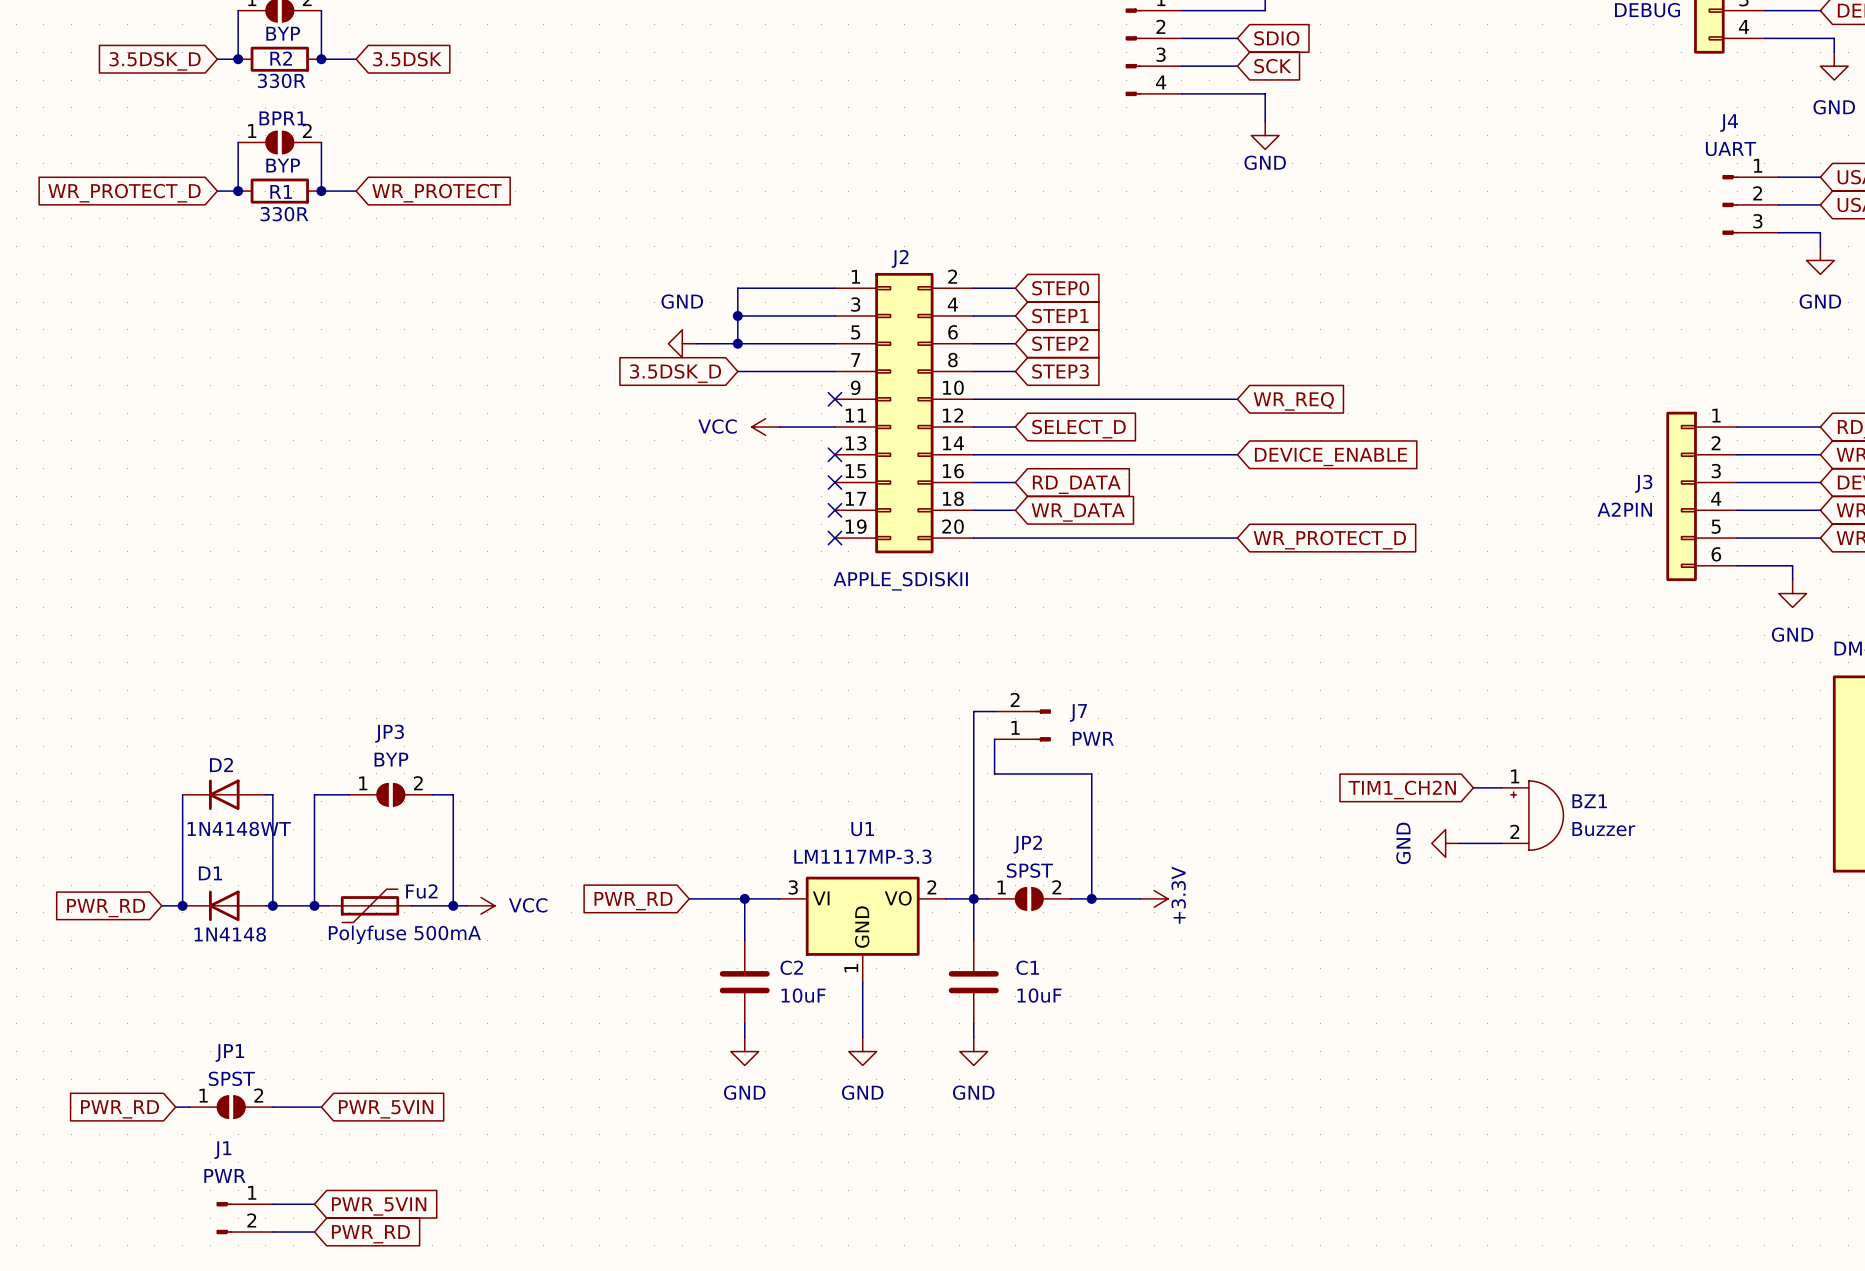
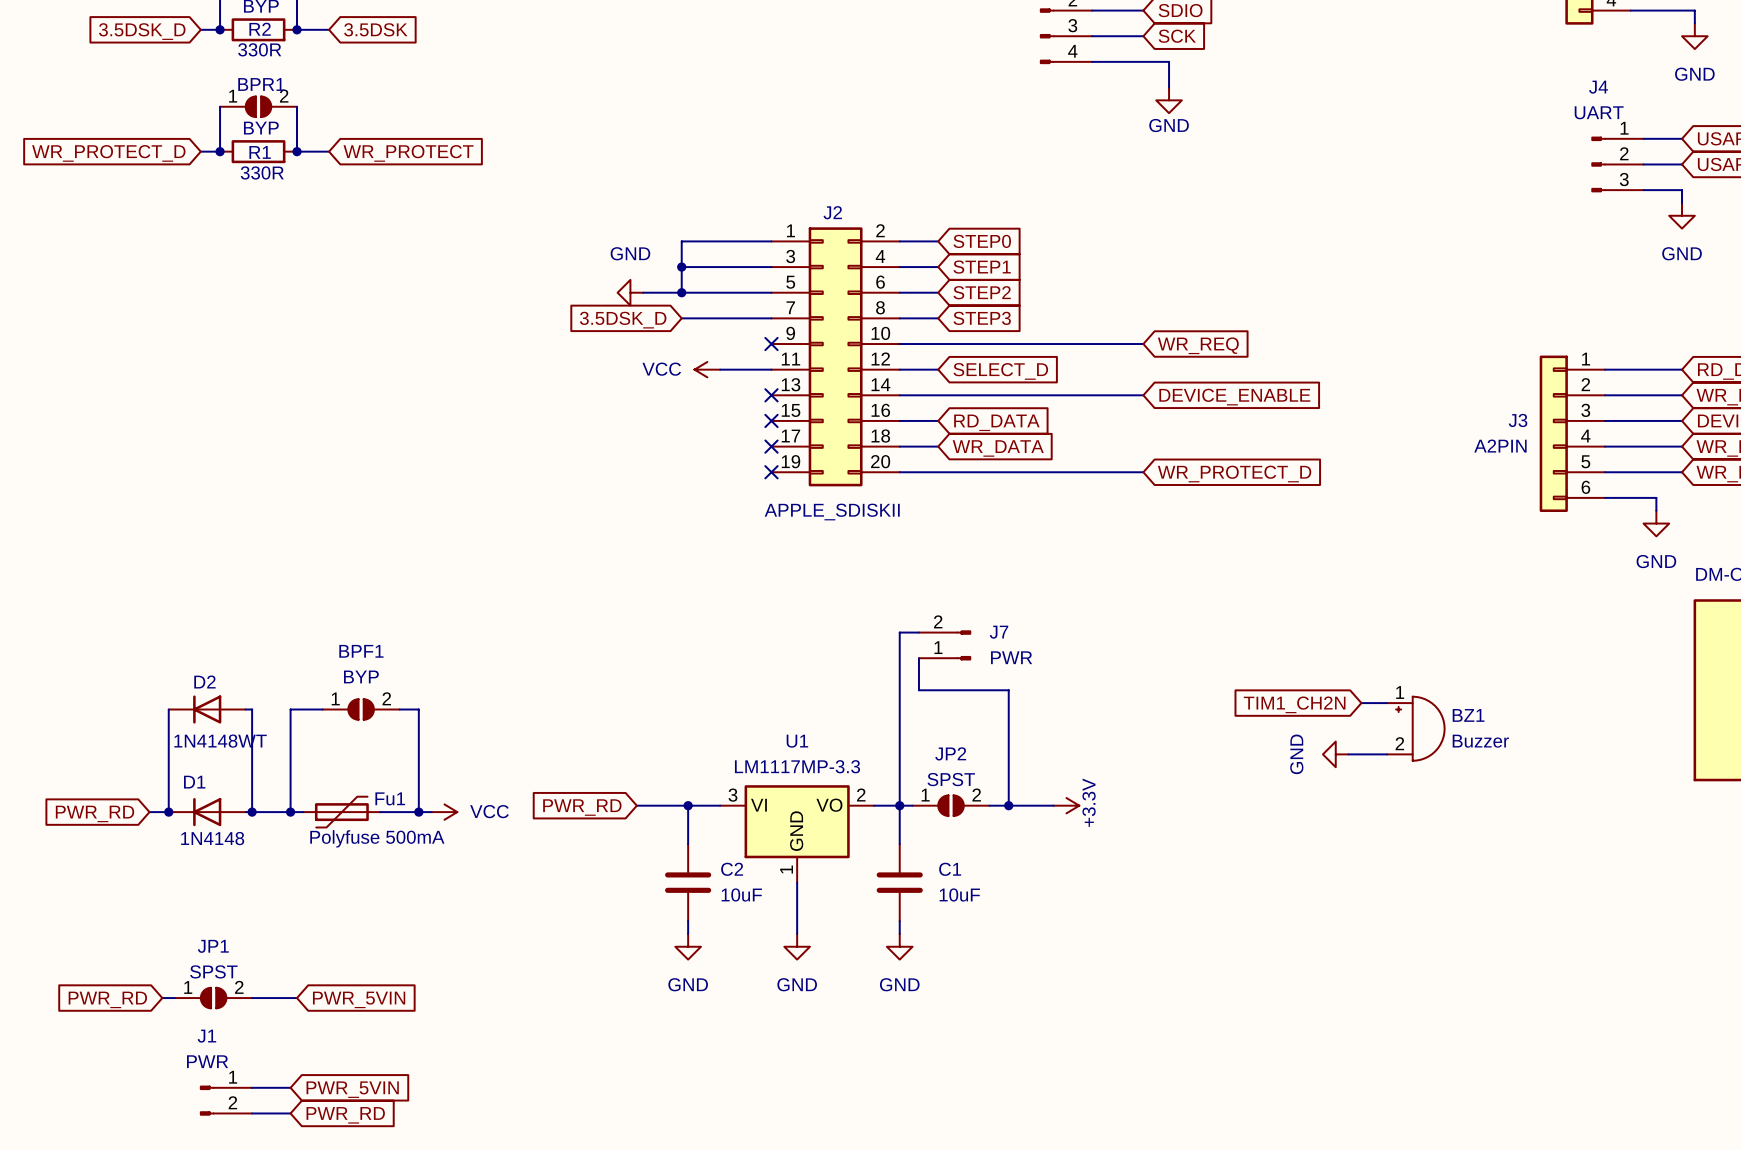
JP3 name: JP3 (389, 733) -> BPF1 (361, 651)
Fu2 name: Fu2 (421, 891) -> Fu1 (390, 798)

